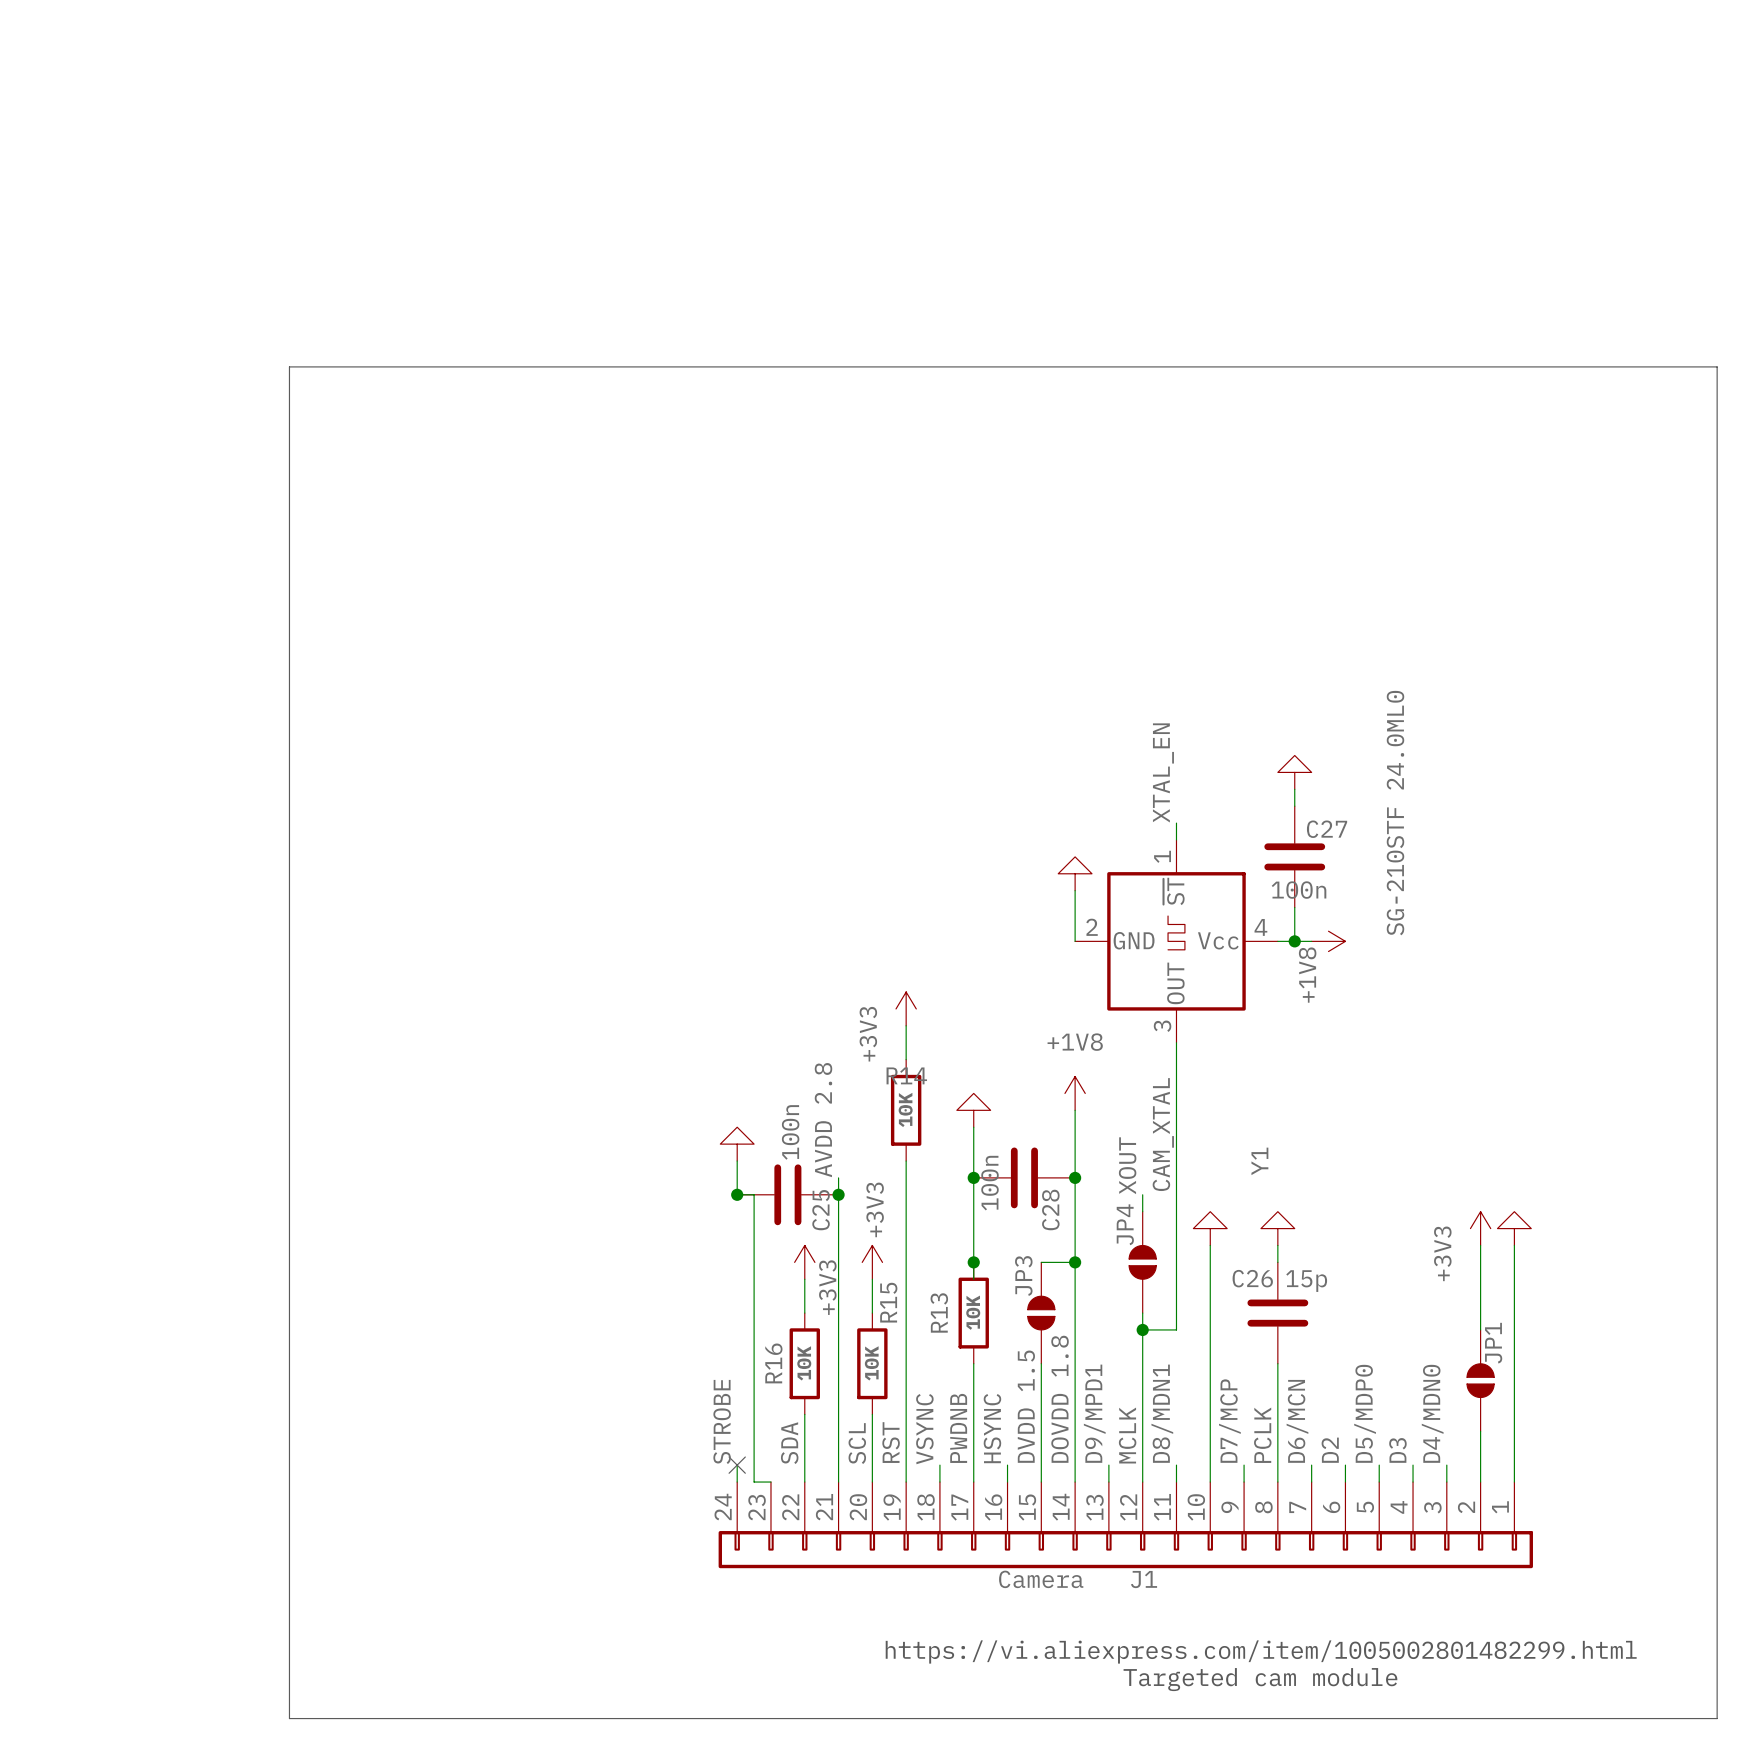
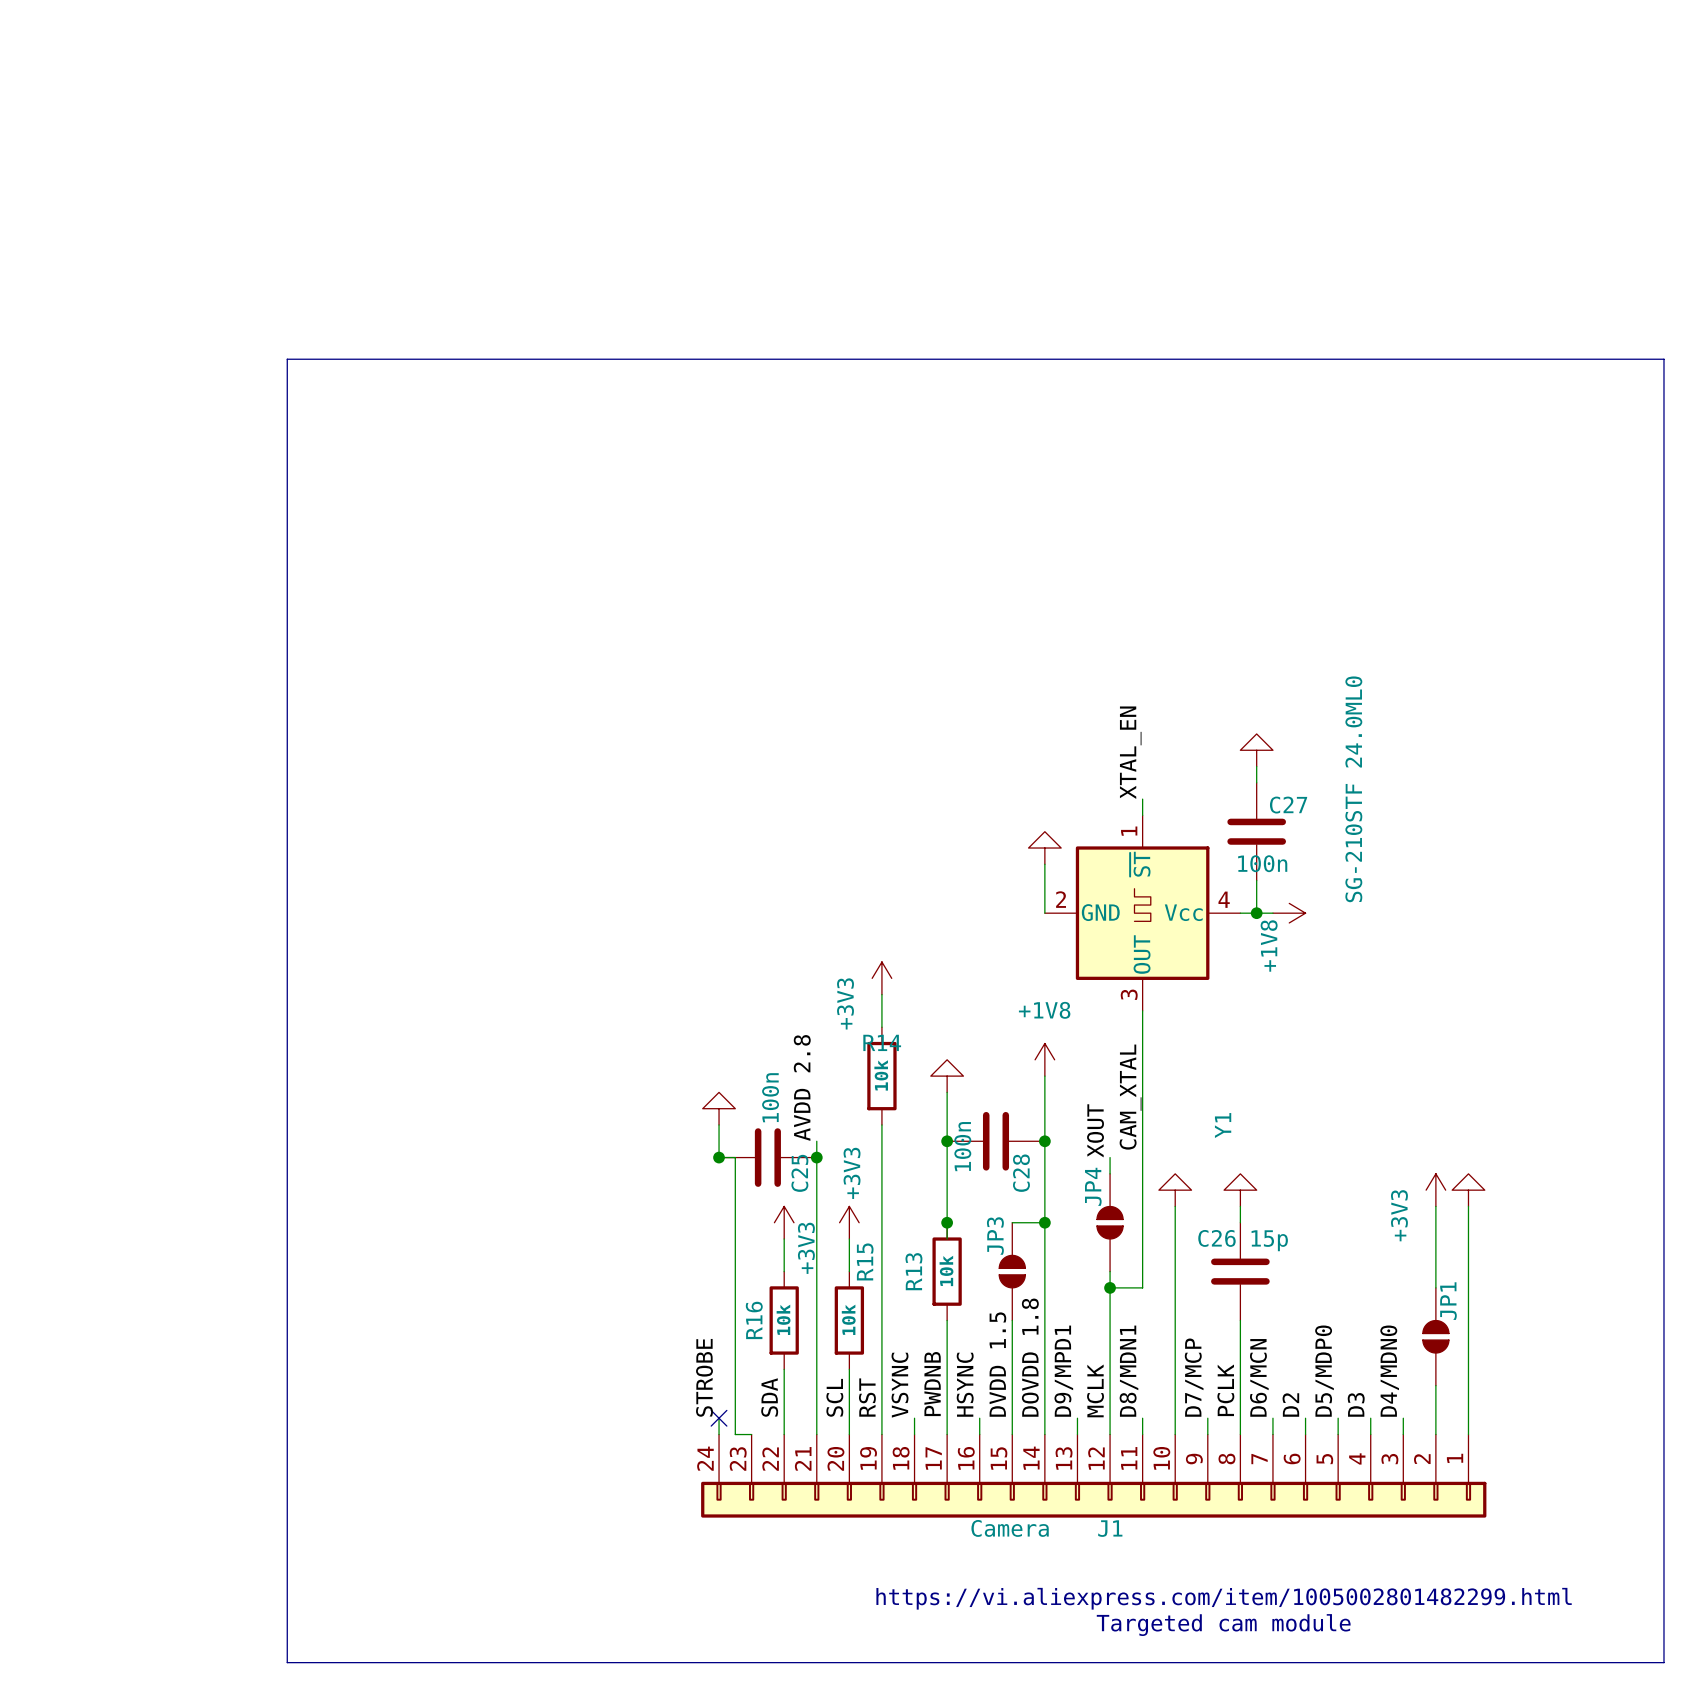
R14 value: 10K (905, 1109) -> 10k (881, 1075)
R13 value: 10K (973, 1312) -> 10k (946, 1270)
R16 value: 10K (804, 1363) -> 10k (783, 1319)
R15 value: 10K (871, 1363) -> 10k (848, 1319)

